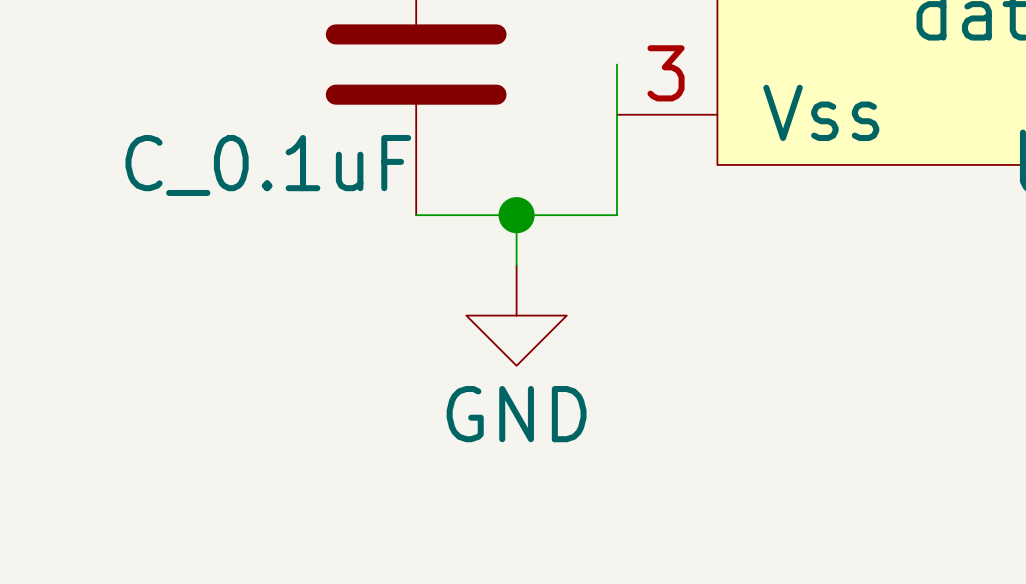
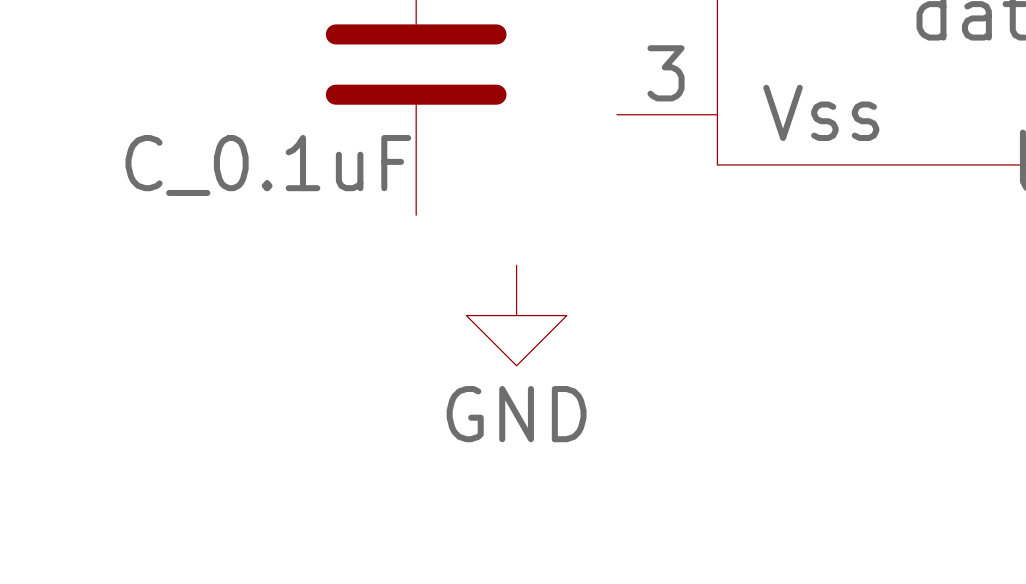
wire: (617, 64) (617, 215) (416, 215) -> none
wire: (516, 215) (516, 265) -> none
junction: (516, 215) -> none

